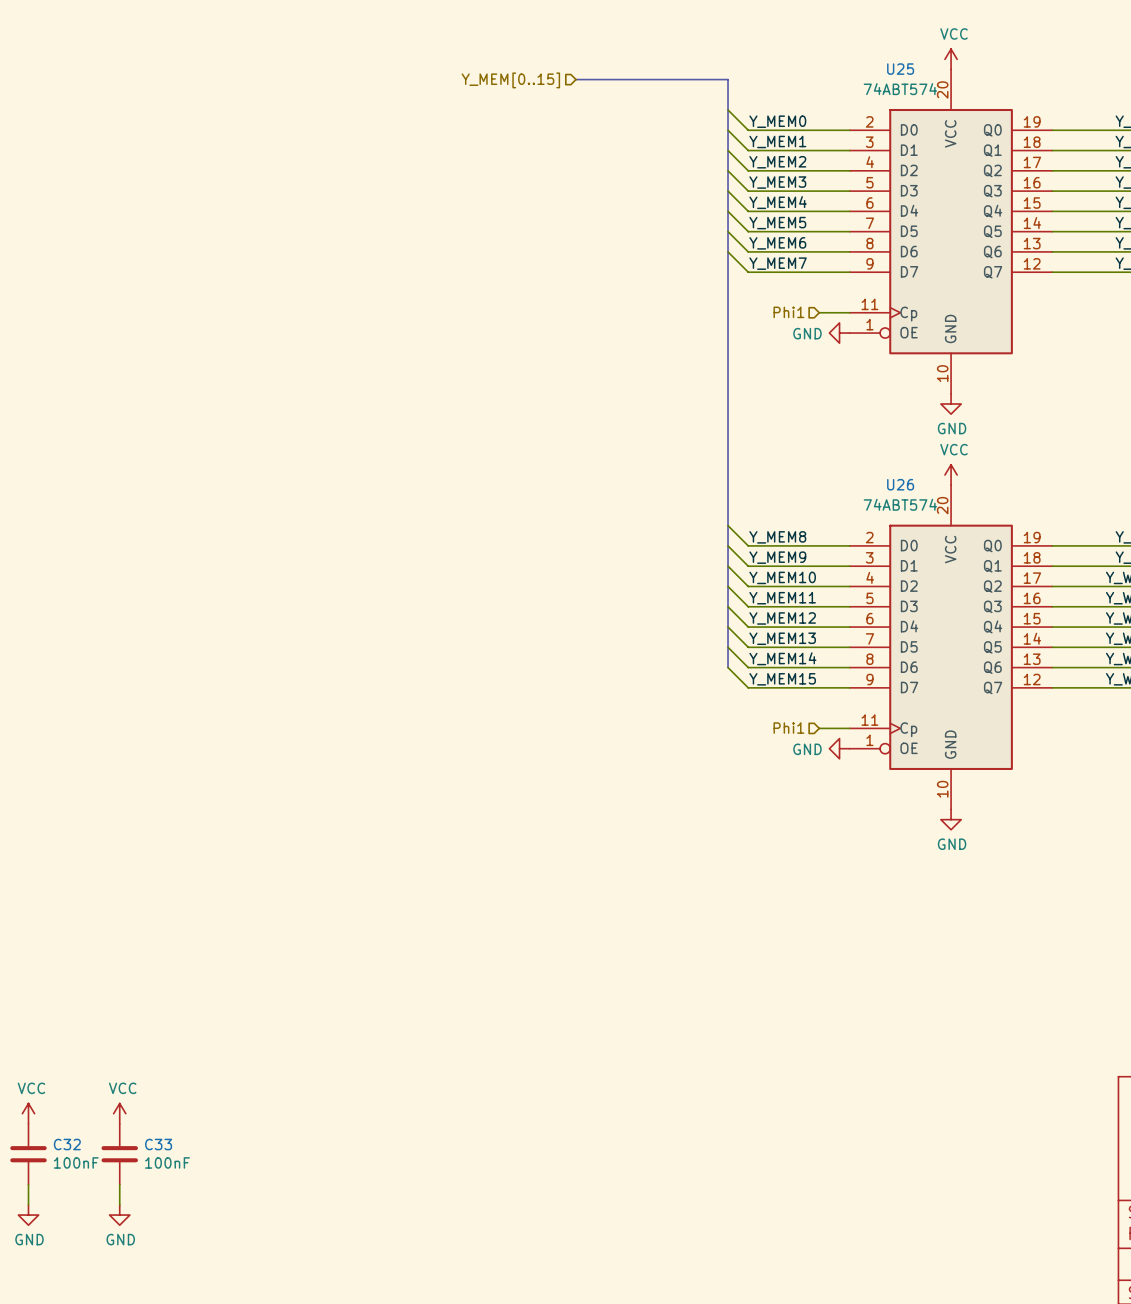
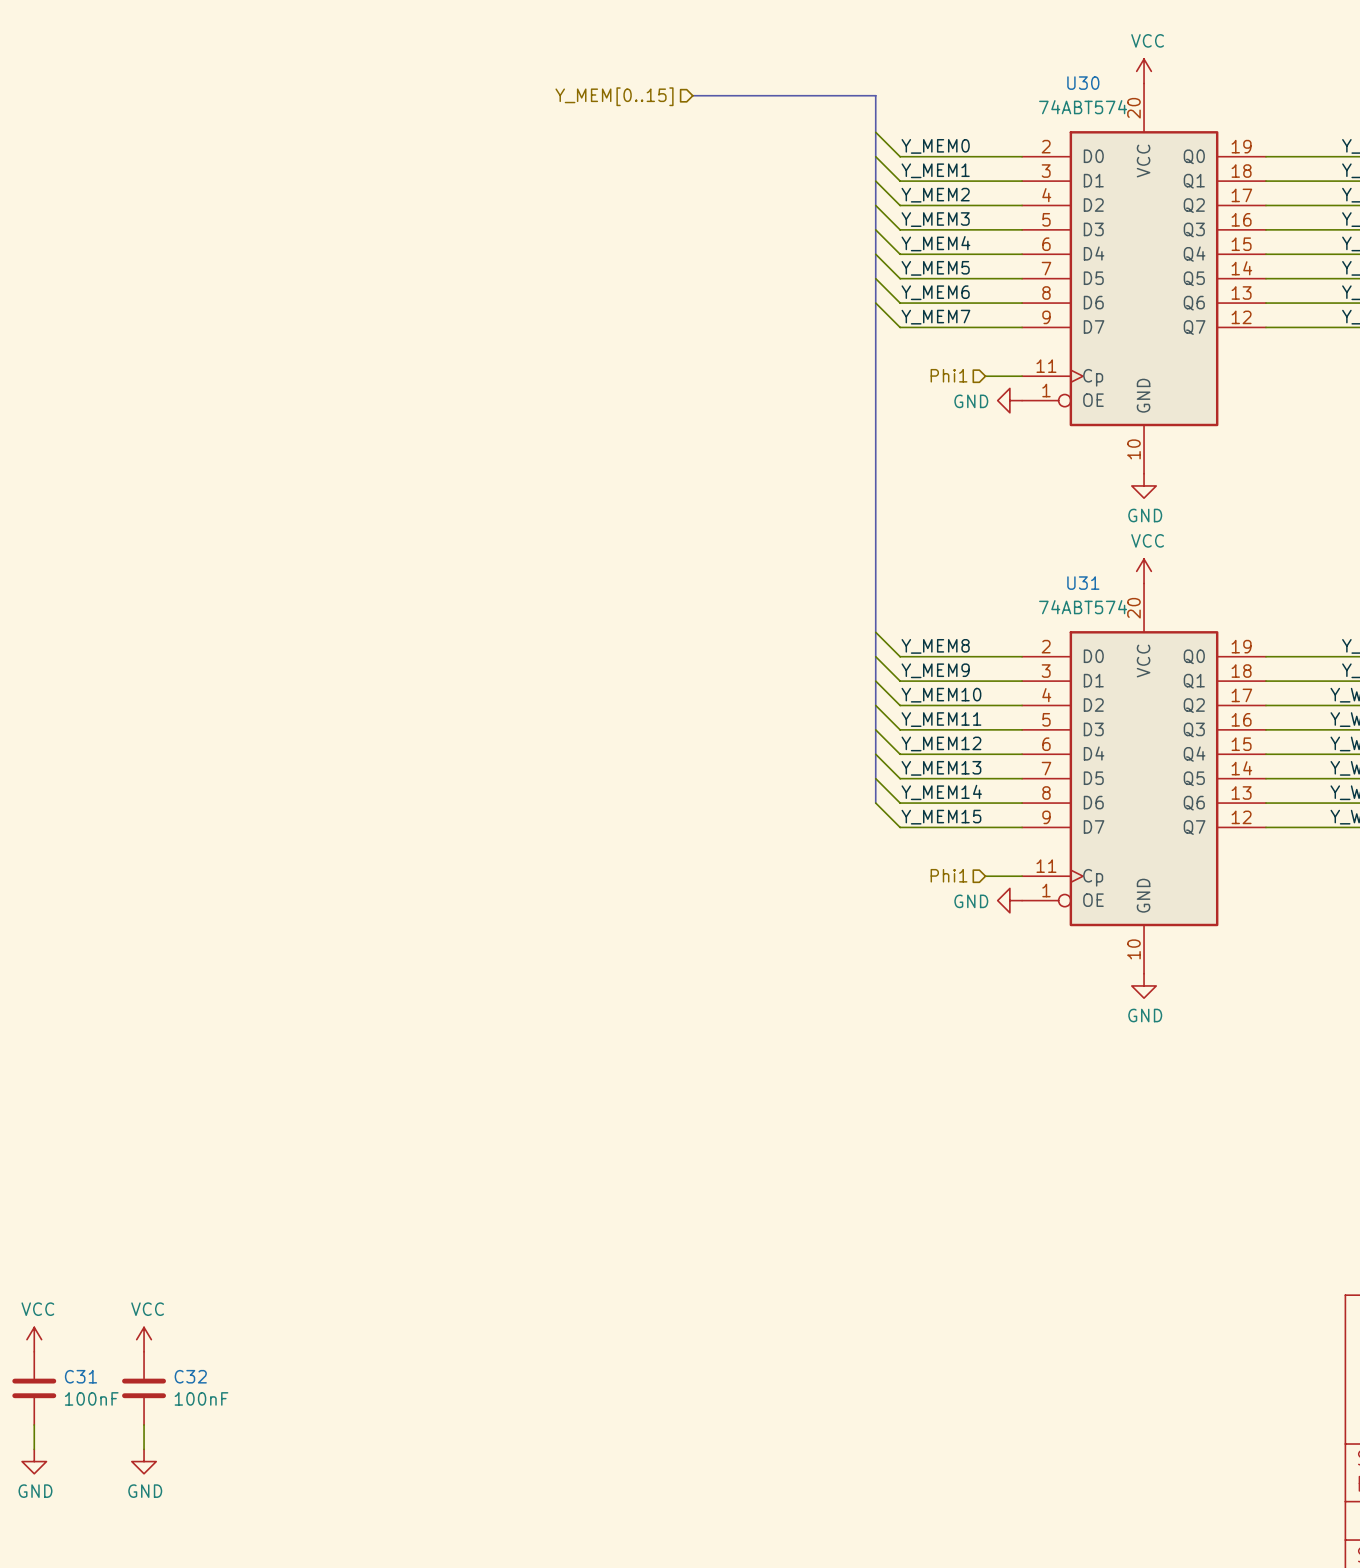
U25 name: U25 (900, 69) -> U30 (1083, 83)
U26 name: U26 (900, 484) -> U31 (1083, 583)
C32 name: C32 (67, 1144) -> C31 (81, 1376)
C33 name: C33 (158, 1144) -> C32 (190, 1376)

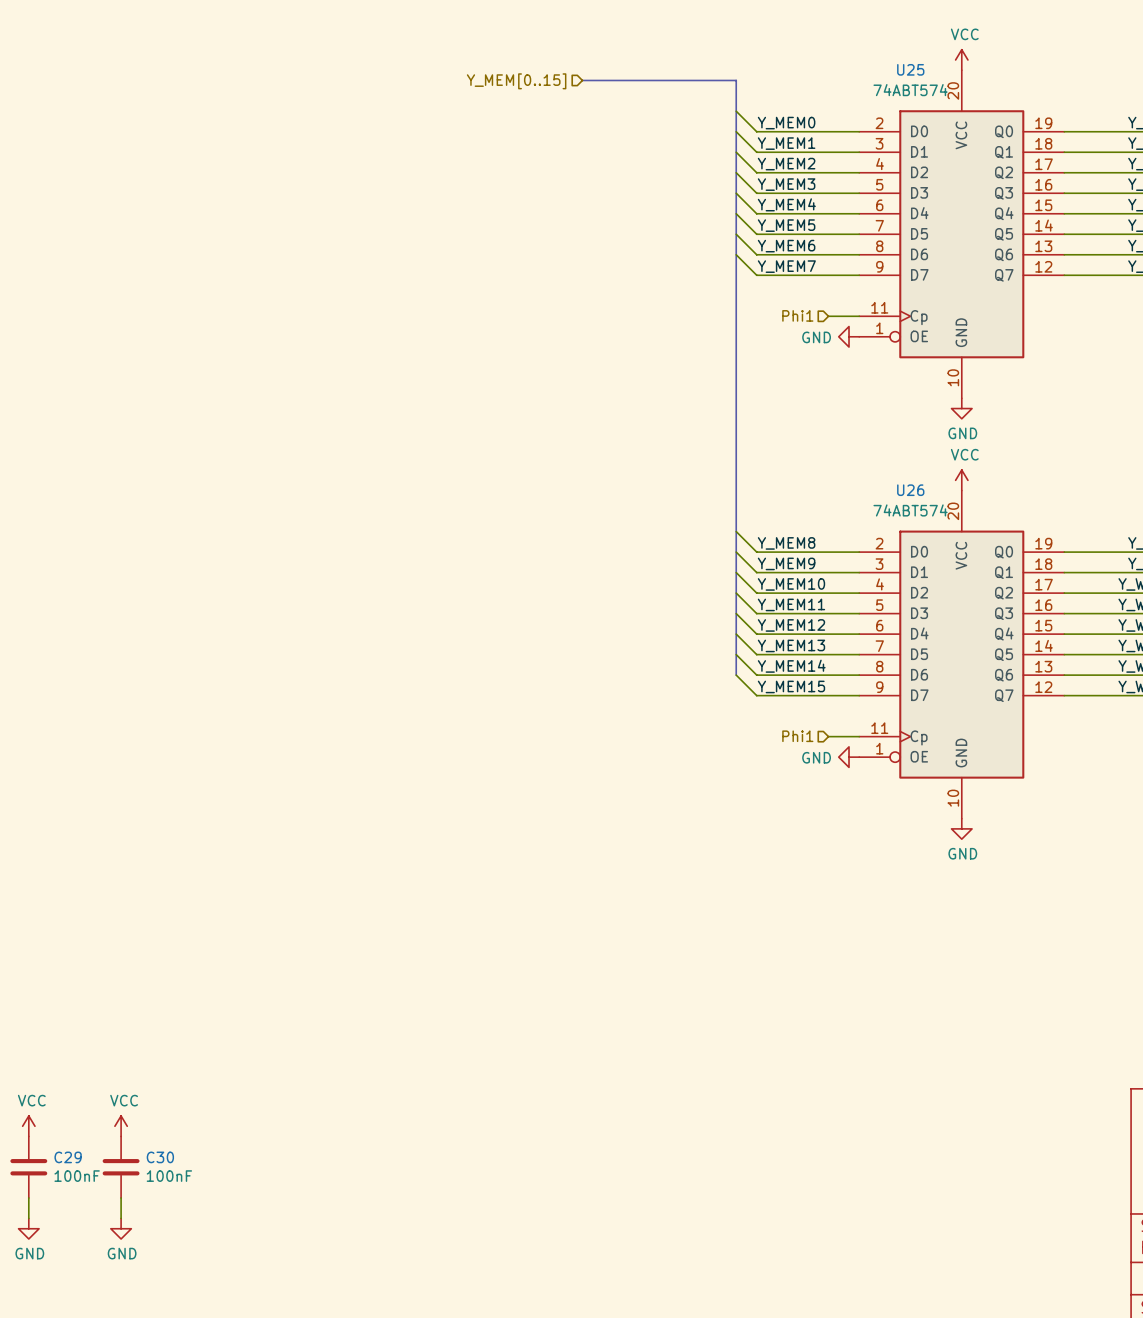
U30 name: U30 (1083, 83) -> U25 (910, 69)
U31 name: U31 (1083, 583) -> U26 (910, 490)
C31 name: C31 (81, 1376) -> C29 (68, 1157)
C32 name: C32 (190, 1376) -> C30 (160, 1157)

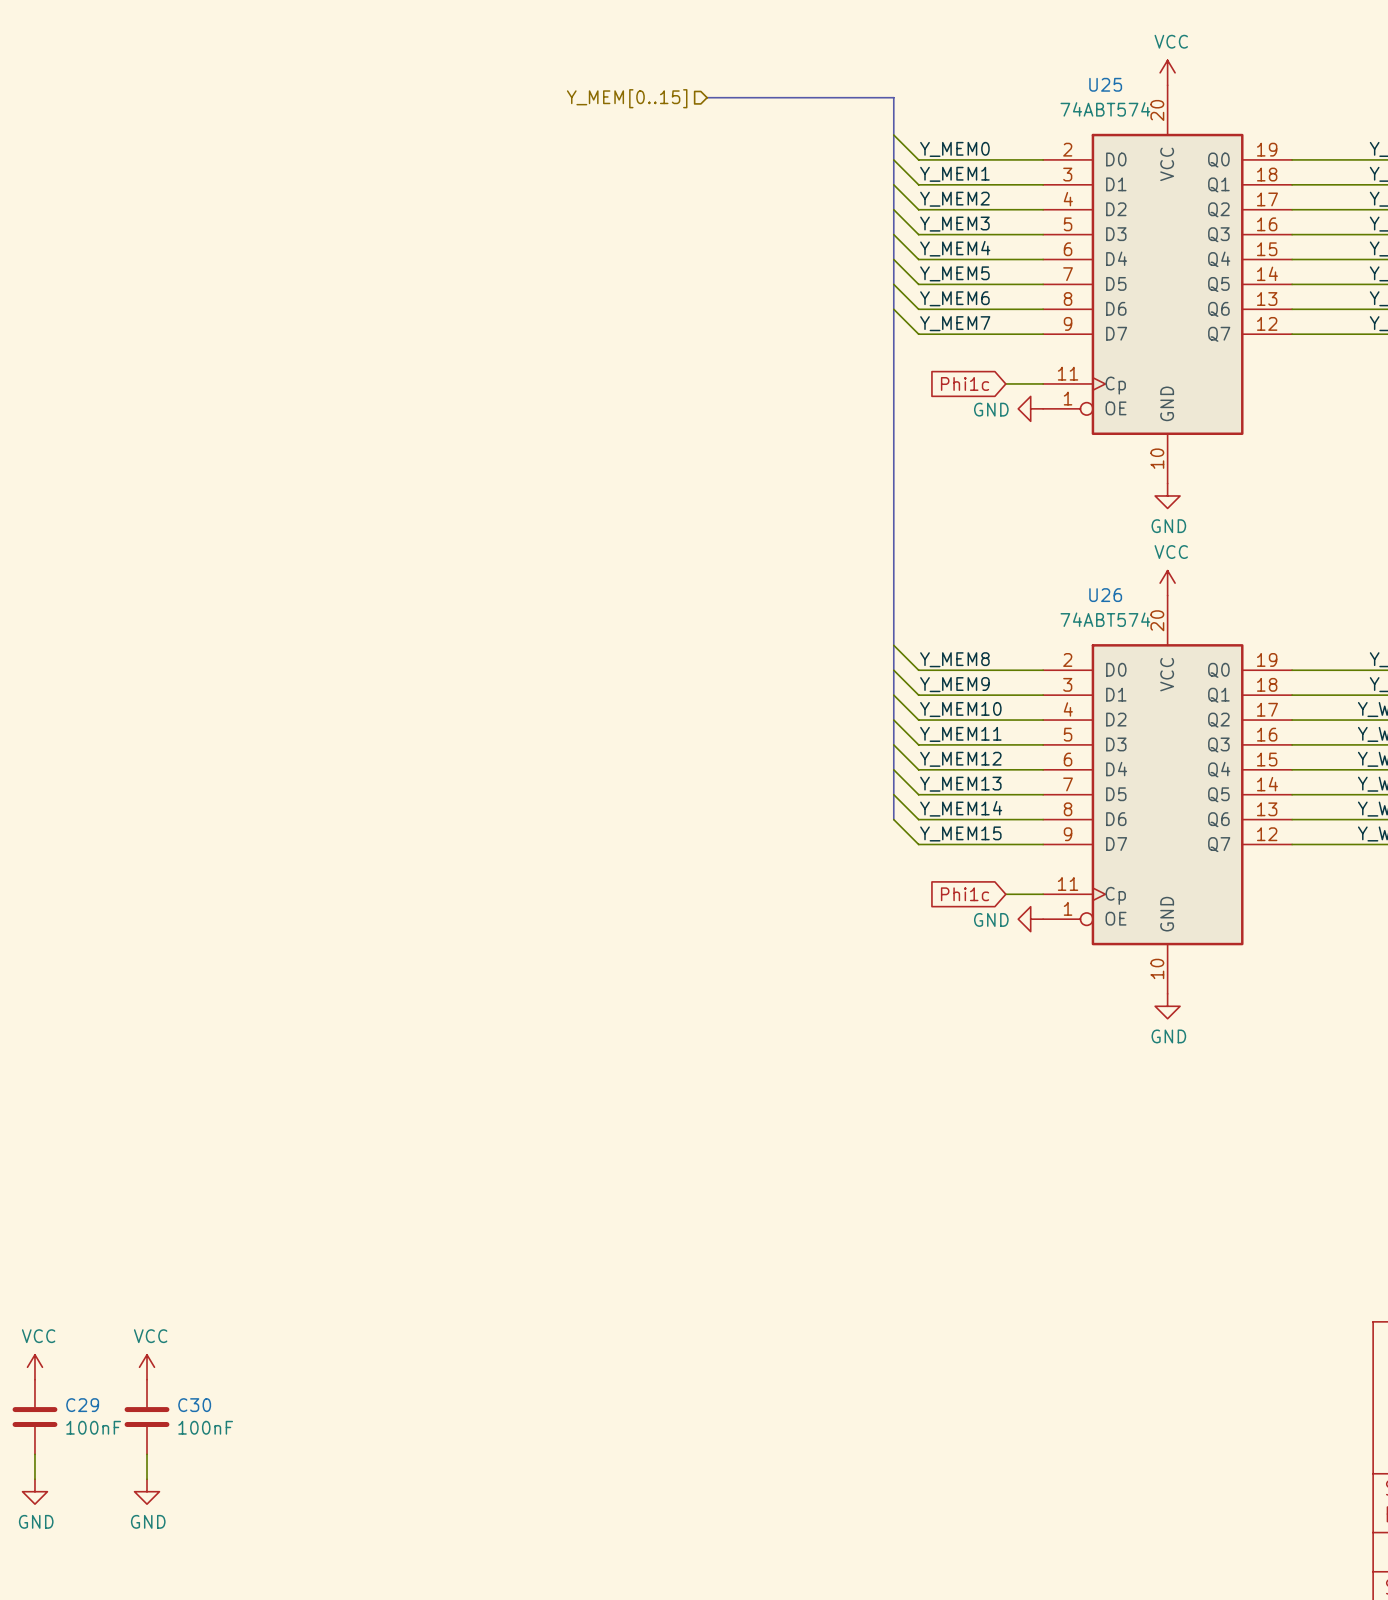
hierarchical label: Phi1 (797, 315) -> none
global label: none -> Phi1c (965, 383)
global label: none -> Phi1c (965, 894)
hierarchical label: Phi1 (797, 736) -> none

